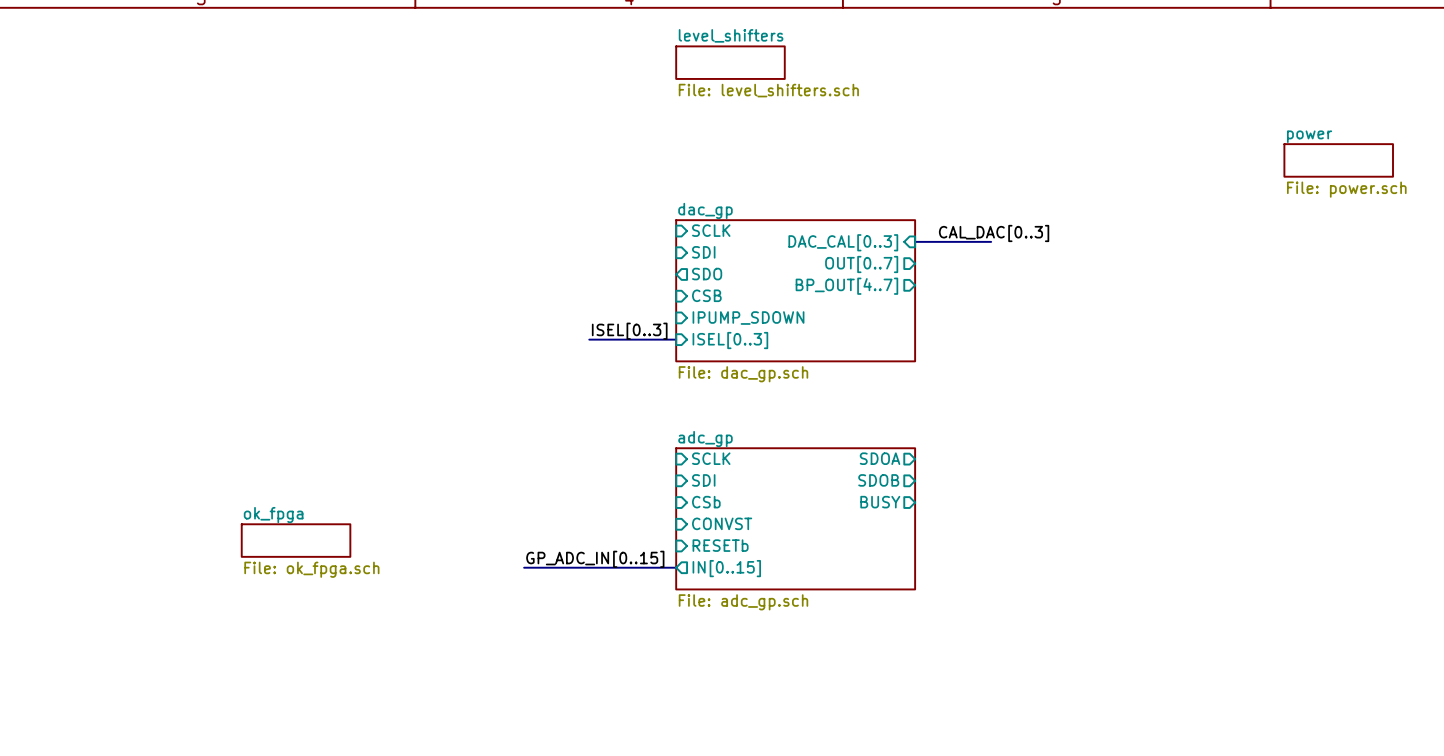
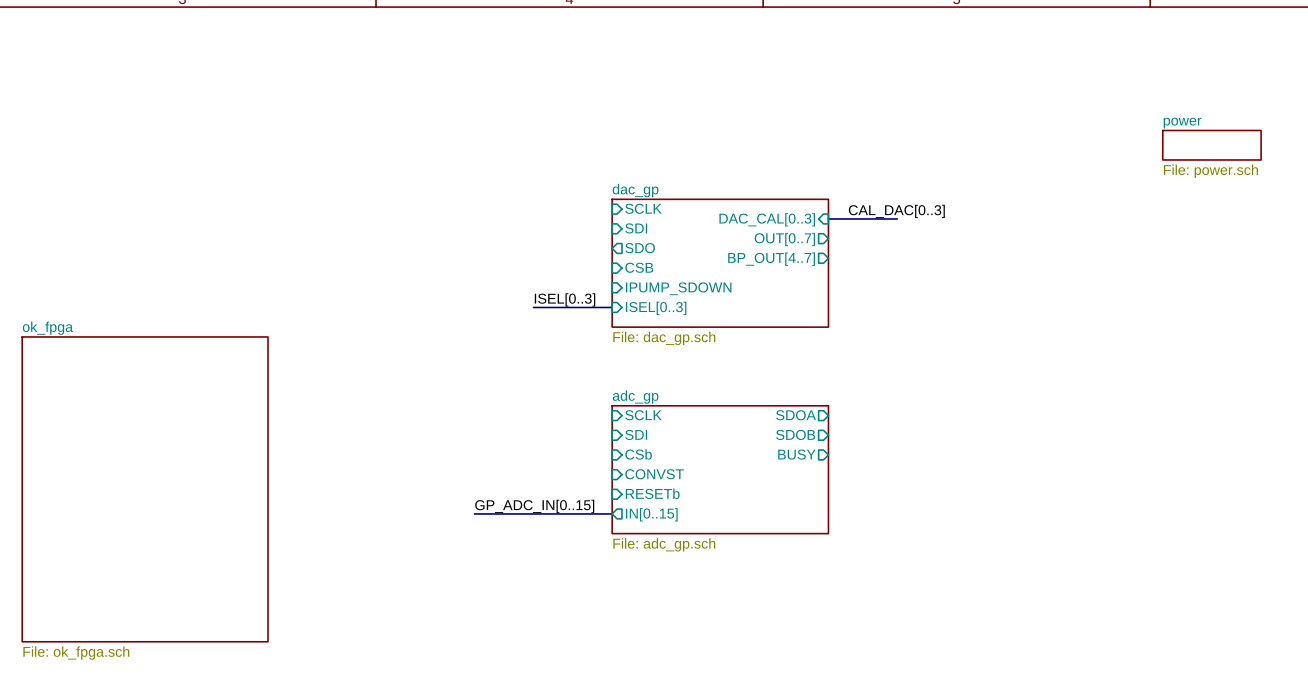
sheet level_shifters: File: level_shifters.sch (730, 62) -> none
sheet ok_fpga: none -> File: ok_fpga.sch (145, 489)
sheet ok_fpga: File: ok_fpga.sch (296, 540) -> none

